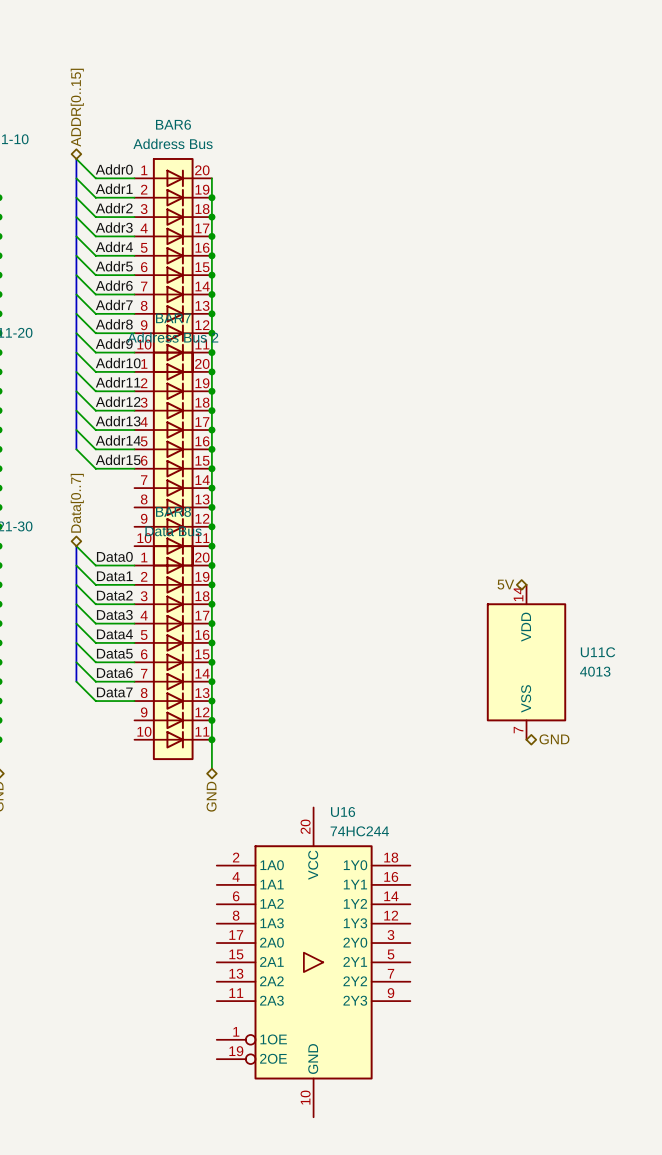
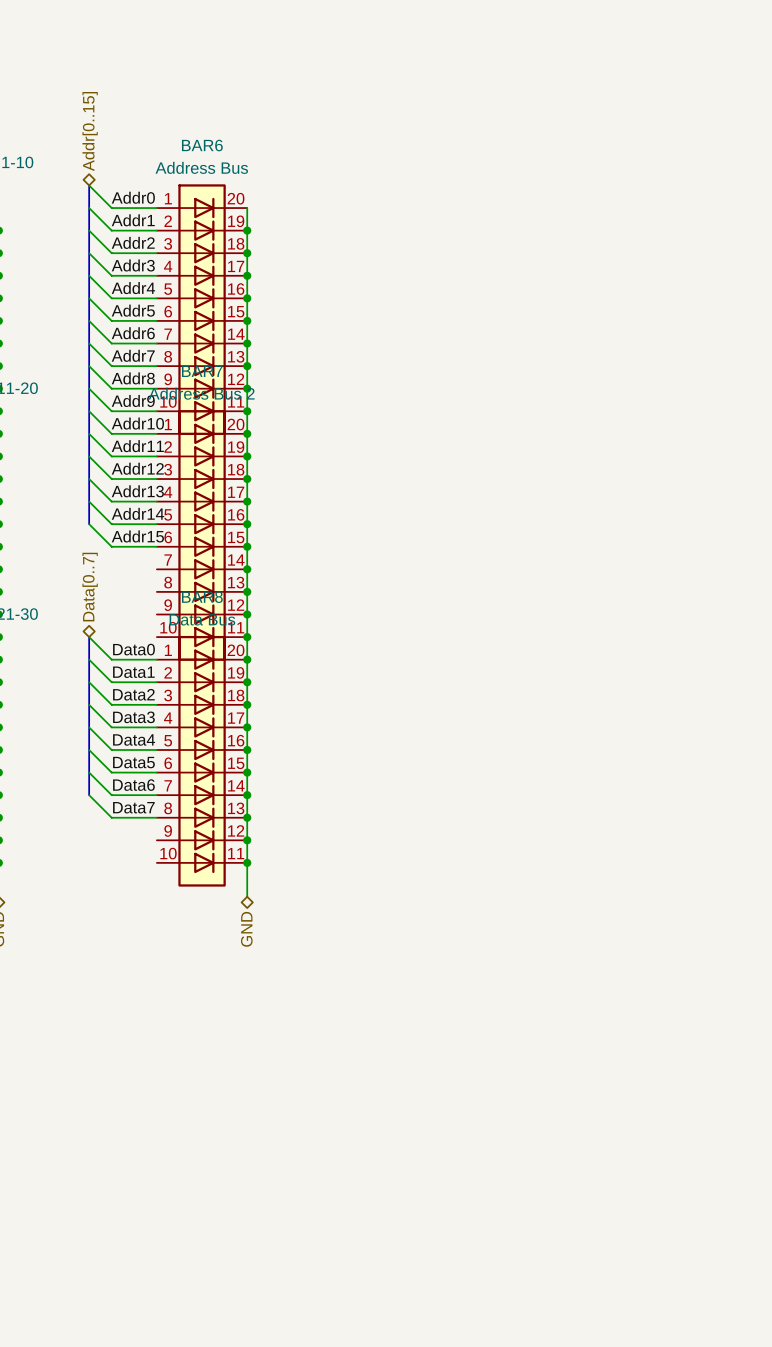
hierarchical label: ADDR[0..15] (77, 107) -> Addr[0..15] (90, 131)
hierarchical label: 5V (505, 584) -> none
U11C: 4013 (526, 662) -> none
hierarchical label: GND (554, 739) -> none
U16: 74HC244 (313, 962) -> none

